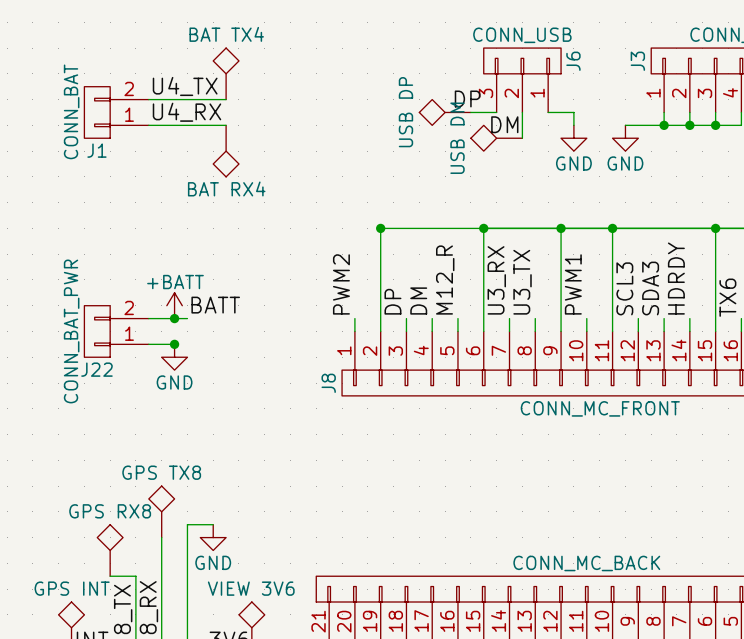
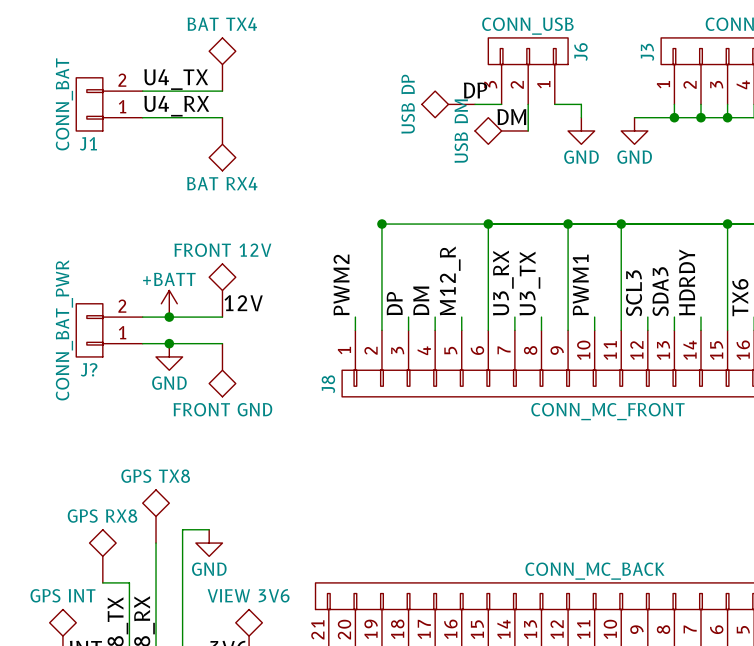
part: none -> FRONT 12V (222, 290)
label: BATT (215, 305) -> none
label: none -> 12V (243, 303)
wire: none -> (182, 317) (222, 317)
wire: none -> (169, 343) (222, 343)
J22 name: J22 (96, 369) -> J? (89, 369)
part: none -> FRONT GND (222, 370)

